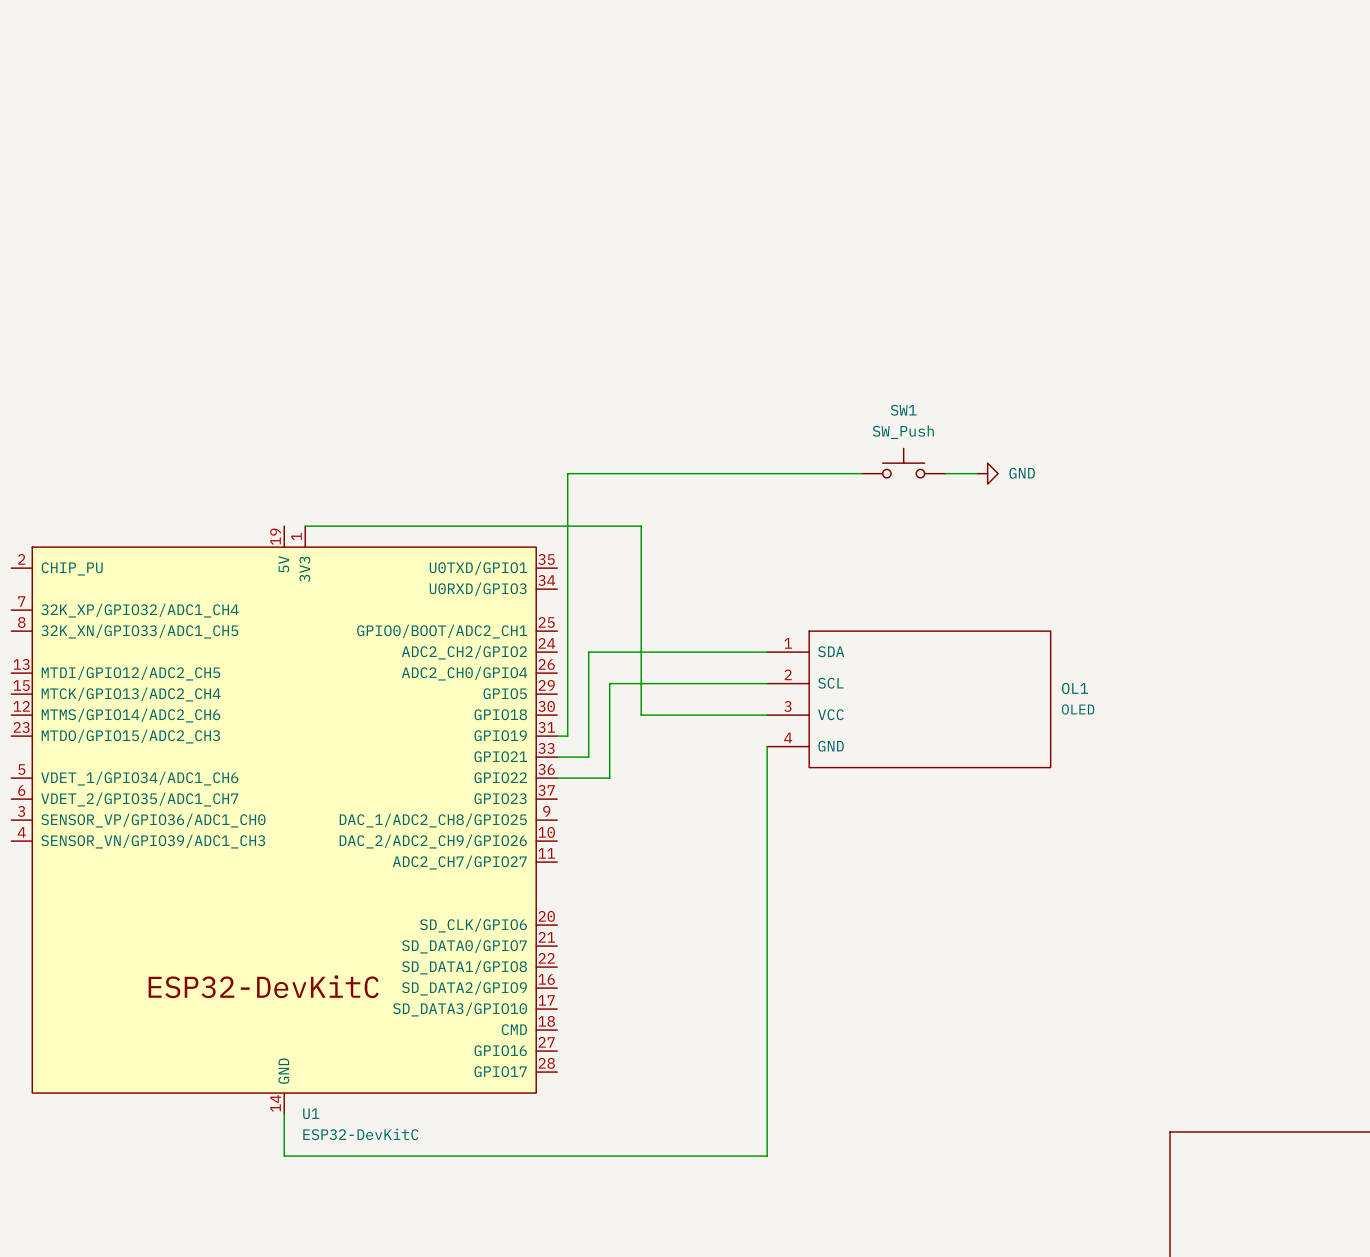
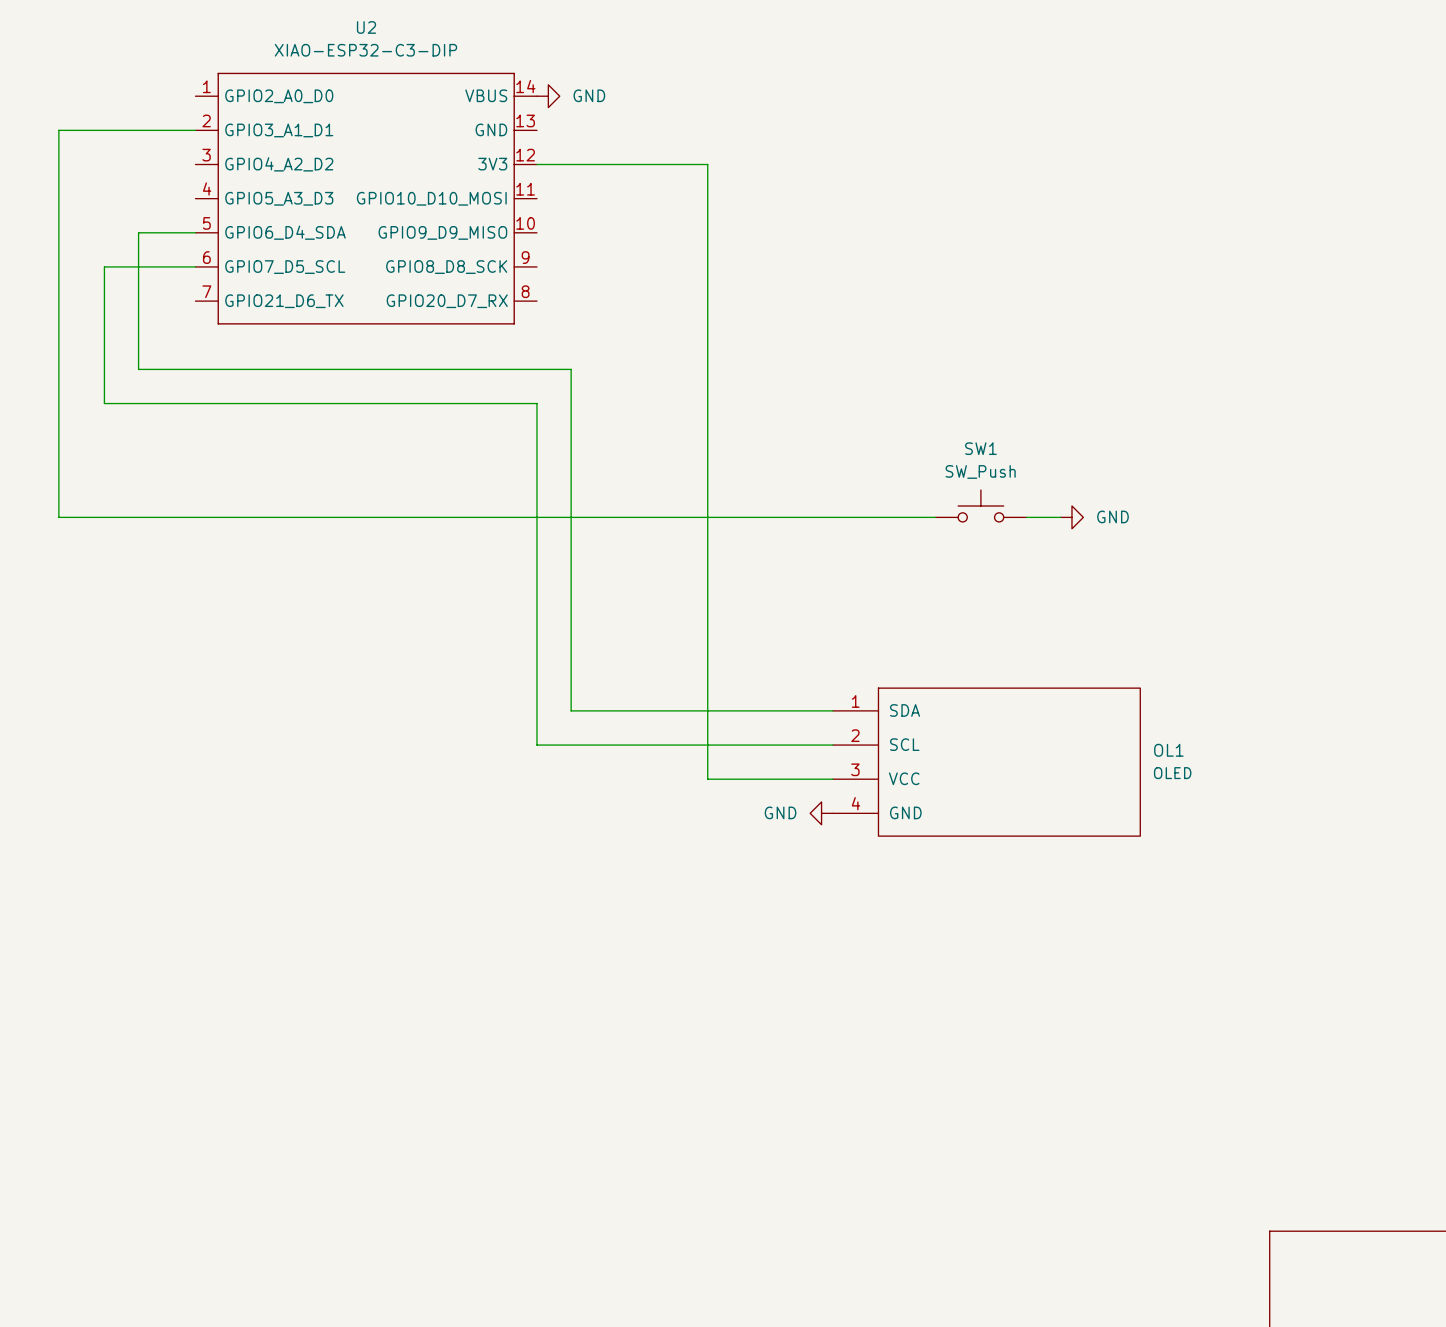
power symbol: none -> GND (548, 96)
U2: none -> XIAO-ESP32-C3-DIP (366, 198)
wire: (567, 473) (567, 736) (557, 736) -> (616, 517) (58, 517) (58, 130) (195, 130)
wire: (305, 526) (641, 526) (641, 715) (651, 715) -> (536, 164) (707, 164) (707, 779)
wire: (588, 652) (588, 757) (557, 757) -> (639, 710) (571, 710) (571, 369) (138, 369) (138, 232) (195, 232)
wire: (609, 683) (609, 778) (557, 778) -> (662, 745) (536, 745) (536, 403) (104, 403) (104, 266) (195, 266)
power symbol: none -> GND (821, 813)
wire: (767, 746) (767, 1156) (284, 1156) (284, 1114) -> none
U1: ESP32-DevKitC (284, 820) -> none

